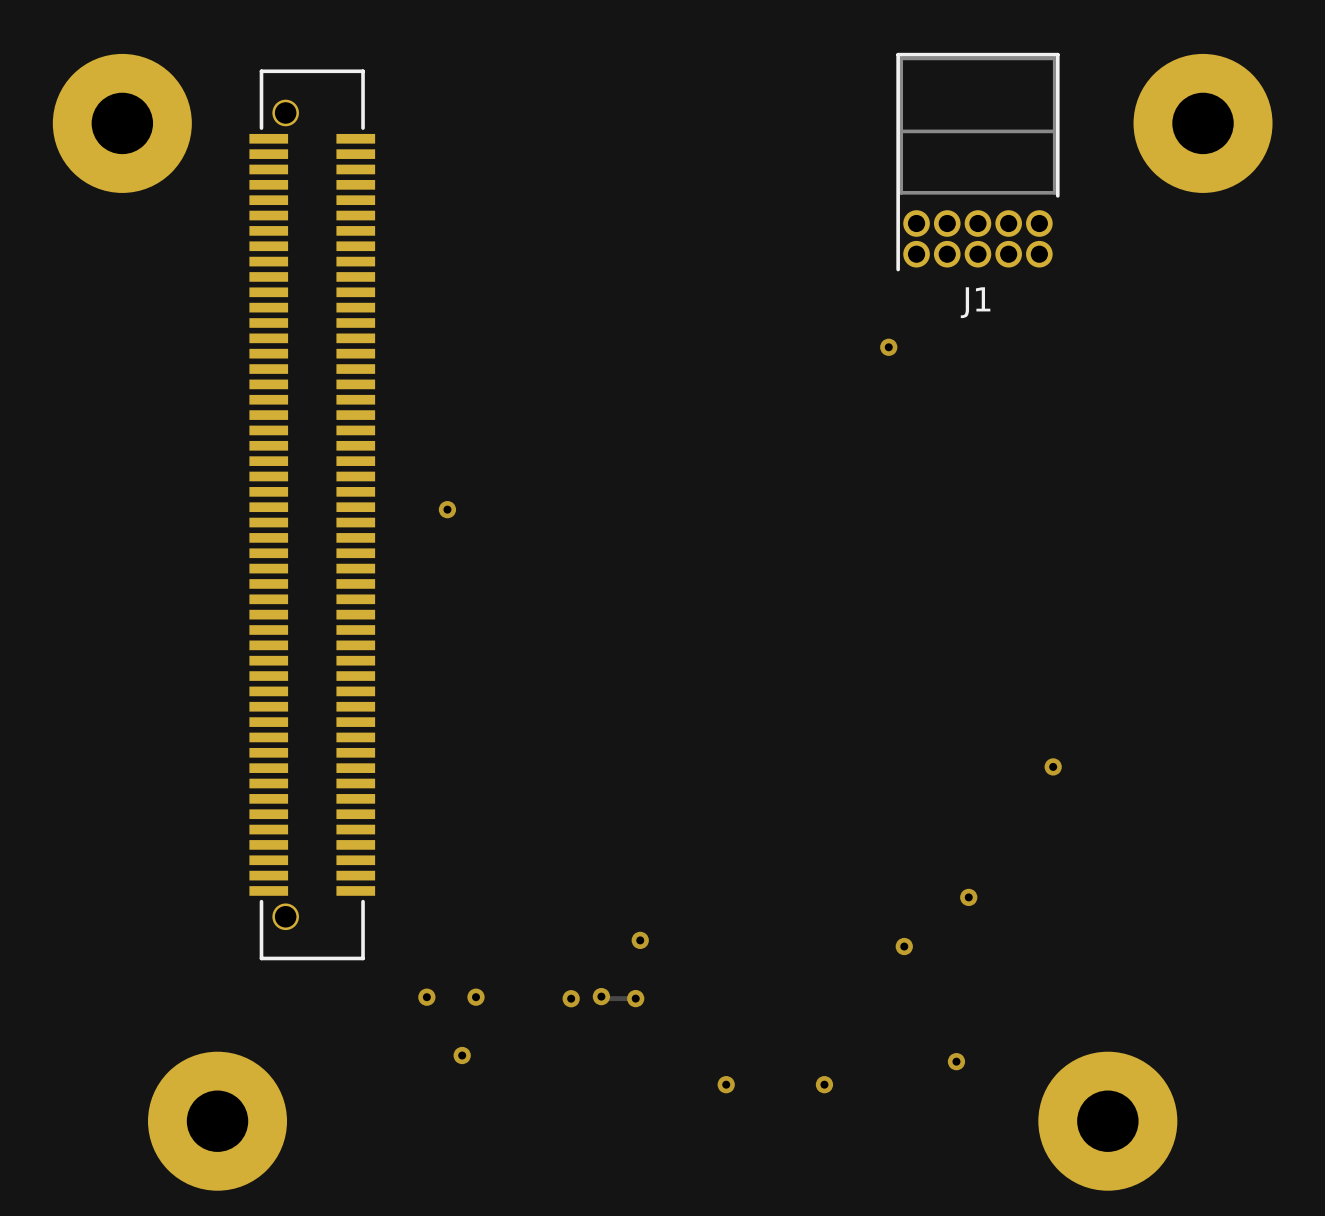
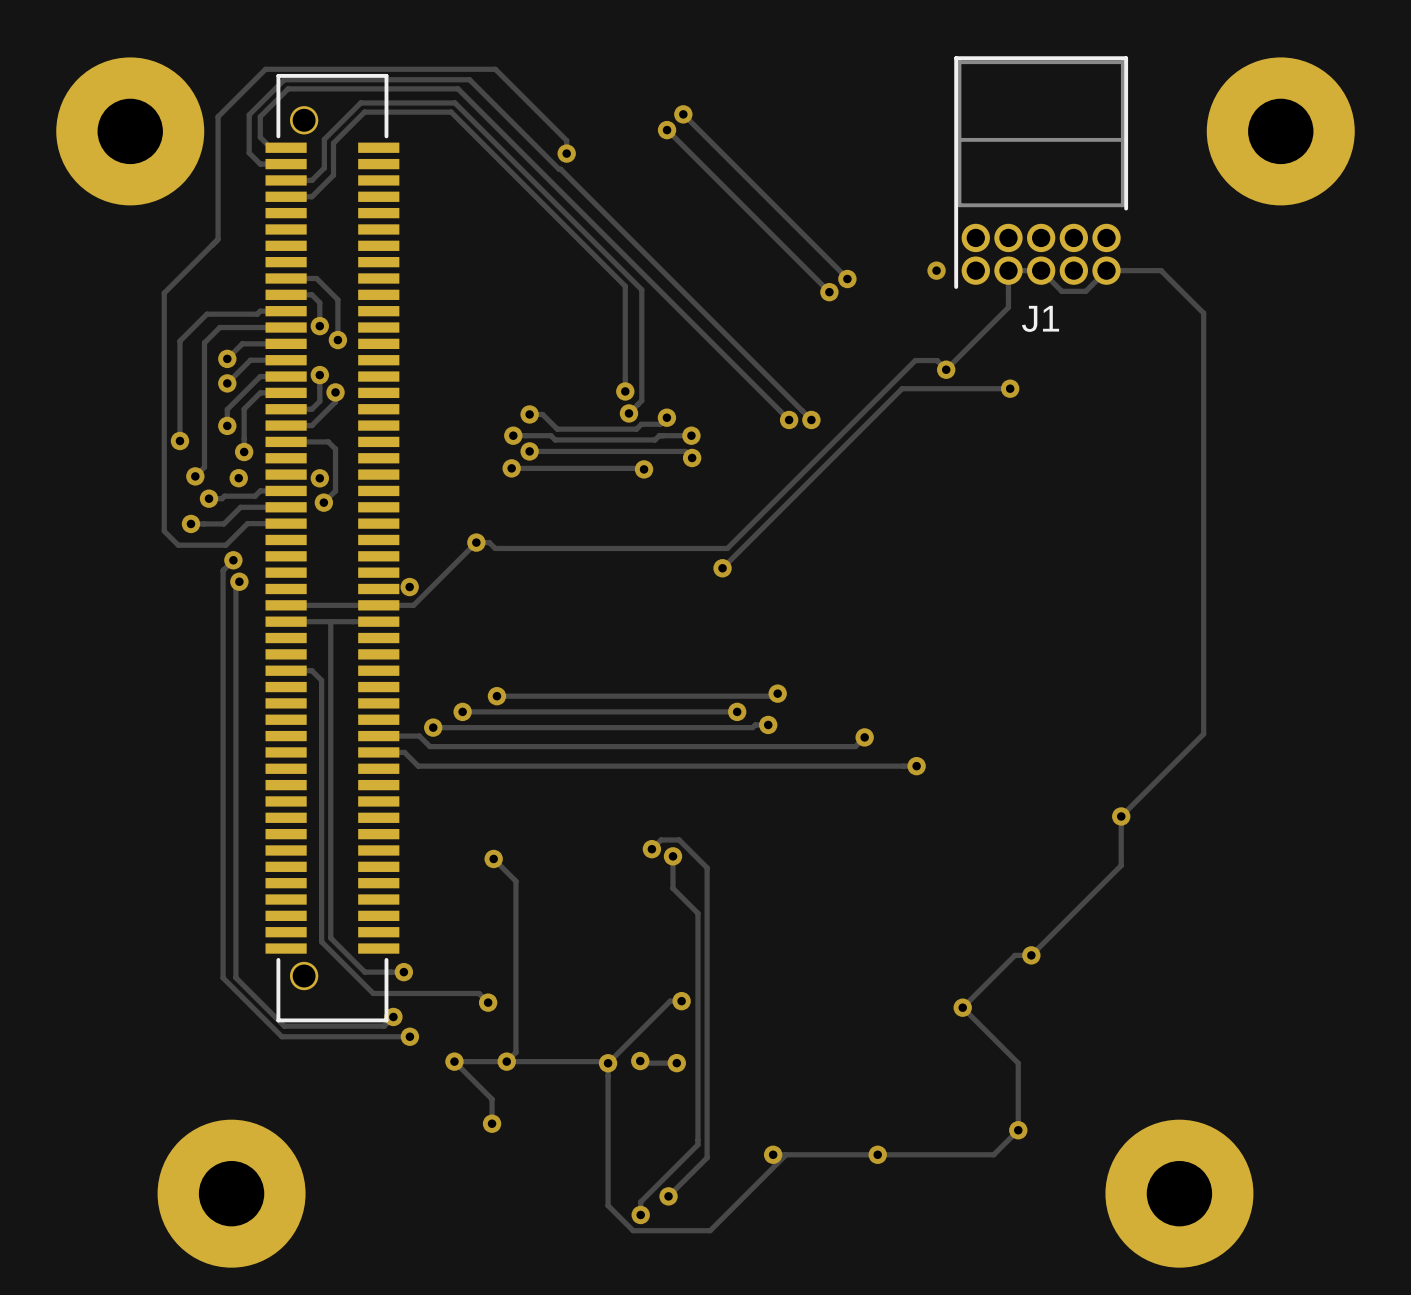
track: none -> (683, 114) (847, 279)
via: none -> (683, 114)
track: none -> (667, 130) (829, 292)
via: none -> (667, 130)
track: none -> (286, 147) (270, 147) (260, 137) (260, 116) (288, 88) (458, 88) (789, 419)
track: none -> (566, 153) (566, 140) (495, 69) (265, 69) (218, 116) (218, 239) (164, 293) (164, 531) (178, 545) (225, 545) (247, 523) (286, 523)
via: none -> (566, 153)
track: none -> (286, 164) (260, 164) (249, 153) (249, 114) (284, 79) (469, 79) (811, 419)
track: none -> (286, 180) (311, 180) (324, 167) (324, 139) (360, 102) (454, 102) (641, 289) (641, 400) (628, 413)
track: none -> (286, 196) (311, 196) (333, 175) (333, 143) (364, 112) (451, 112) (625, 286) (625, 391)
via: none -> (936, 270)
track: none -> (286, 278) (316, 278) (337, 299) (337, 340)
via: none -> (847, 279)
via: none -> (829, 292)
track: none -> (286, 294) (311, 294) (319, 302) (319, 326)
track: none -> (286, 311) (260, 311) (257, 314) (206, 314) (179, 341) (179, 440)
via: none -> (319, 326)
track: none -> (286, 327) (219, 327) (204, 342) (204, 467) (195, 476)
via: none -> (337, 340)
track: none -> (286, 343) (242, 343) (227, 358)
via: none -> (227, 358)
track: none -> (286, 360) (250, 360) (227, 383)
track: none -> (319, 375) (319, 401) (311, 409) (286, 409)
via: none -> (319, 375)
track: none -> (286, 376) (260, 376) (227, 409) (227, 425)
via: none -> (227, 383)
track: none -> (1010, 388) (902, 388) (722, 568)
via: none -> (1010, 388)
via: none -> (625, 391)
track: none -> (335, 392) (335, 401) (311, 425) (286, 425)
via: none -> (335, 392)
track: none -> (286, 392) (260, 392) (244, 409) (244, 452)
via: none -> (628, 413)
track: none -> (529, 414) (542, 414) (557, 429) (636, 429) (641, 424) (660, 424) (666, 417)
via: none -> (529, 414)
via: none -> (666, 417)
via: none -> (789, 419)
via: none -> (811, 419)
via: none -> (227, 425)
via: none -> (513, 435)
track: none -> (691, 435) (659, 435) (655, 439) (555, 439) (550, 435) (513, 435)
via: none -> (691, 435)
via: none -> (179, 440)
track: none -> (286, 441) (328, 441) (335, 449) (335, 490) (323, 502)
via: none -> (244, 452)
track: none -> (529, 451) (685, 451) (692, 457)
via: none -> (529, 451)
via: none -> (692, 457)
track: none -> (511, 468) (644, 469)
via: none -> (511, 468)
via: none -> (644, 469)
via: none -> (195, 476)
via: none -> (238, 478)
via: none -> (319, 478)
track: none -> (286, 490) (260, 490) (255, 496) (224, 496) (221, 498) (209, 498)
via: none -> (209, 498)
via: none -> (323, 502)
track: none -> (286, 507) (240, 507) (223, 523) (190, 523)
via: none -> (190, 523)
track: none -> (233, 560) (223, 570) (223, 977) (281, 1036) (409, 1036)
via: none -> (233, 560)
via: none -> (722, 568)
track: none -> (239, 581) (235, 585) (235, 977) (284, 1026) (384, 1026) (393, 1016)
via: none -> (239, 581)
via: none -> (409, 587)
track: none -> (286, 605) (413, 605) (476, 542) (489, 542) (495, 548) (727, 548) (915, 360) (937, 360) (946, 369) (1008, 307) (1008, 270) (1041, 270) (1061, 291) (1085, 291) (1106, 270) (1161, 270) (1203, 313) (1203, 734) (1121, 816) (1121, 865) (1031, 955) (1015, 955) (962, 1007) (1018, 1063) (1018, 1130) (993, 1154) (773, 1154)
track: none -> (330, 621) (330, 938) (364, 972) (403, 972)
track: none -> (378, 621) (286, 621)
track: none -> (286, 670) (311, 670) (321, 680) (321, 941) (373, 993) (478, 993) (488, 1002)
track: none -> (777, 693) (775, 696) (496, 696)
via: none -> (777, 693)
via: none -> (496, 696)
via: none -> (462, 711)
track: none -> (737, 711) (462, 711)
via: none -> (737, 711)
track: none -> (768, 724) (755, 724) (752, 727) (433, 727)
via: none -> (768, 724)
via: none -> (433, 727)
track: none -> (378, 736) (419, 736) (429, 746) (855, 746) (864, 737)
via: none -> (864, 737)
track: none -> (378, 752) (404, 752) (418, 766) (916, 766)
via: none -> (916, 766)
track: none -> (651, 849) (661, 839) (679, 839) (707, 867) (707, 1157) (668, 1196)
via: none -> (651, 849)
track: none -> (672, 856) (672, 888) (697, 913) (697, 1144) (640, 1201) (640, 1214)
via: none -> (672, 856)
track: none -> (493, 858) (515, 881) (515, 1052) (506, 1061)
via: none -> (493, 858)
via: none -> (403, 972)
track: none -> (679, 1001) (670, 1001) (608, 1063)
via: none -> (488, 1002)
via: none -> (393, 1016)
via: none -> (409, 1036)
track: none -> (608, 1063) (608, 1205) (633, 1230) (710, 1230) (786, 1154)
track: none -> (608, 1063) (606, 1061) (454, 1061) (492, 1099) (492, 1123)
via: none -> (668, 1196)
via: none -> (640, 1214)

